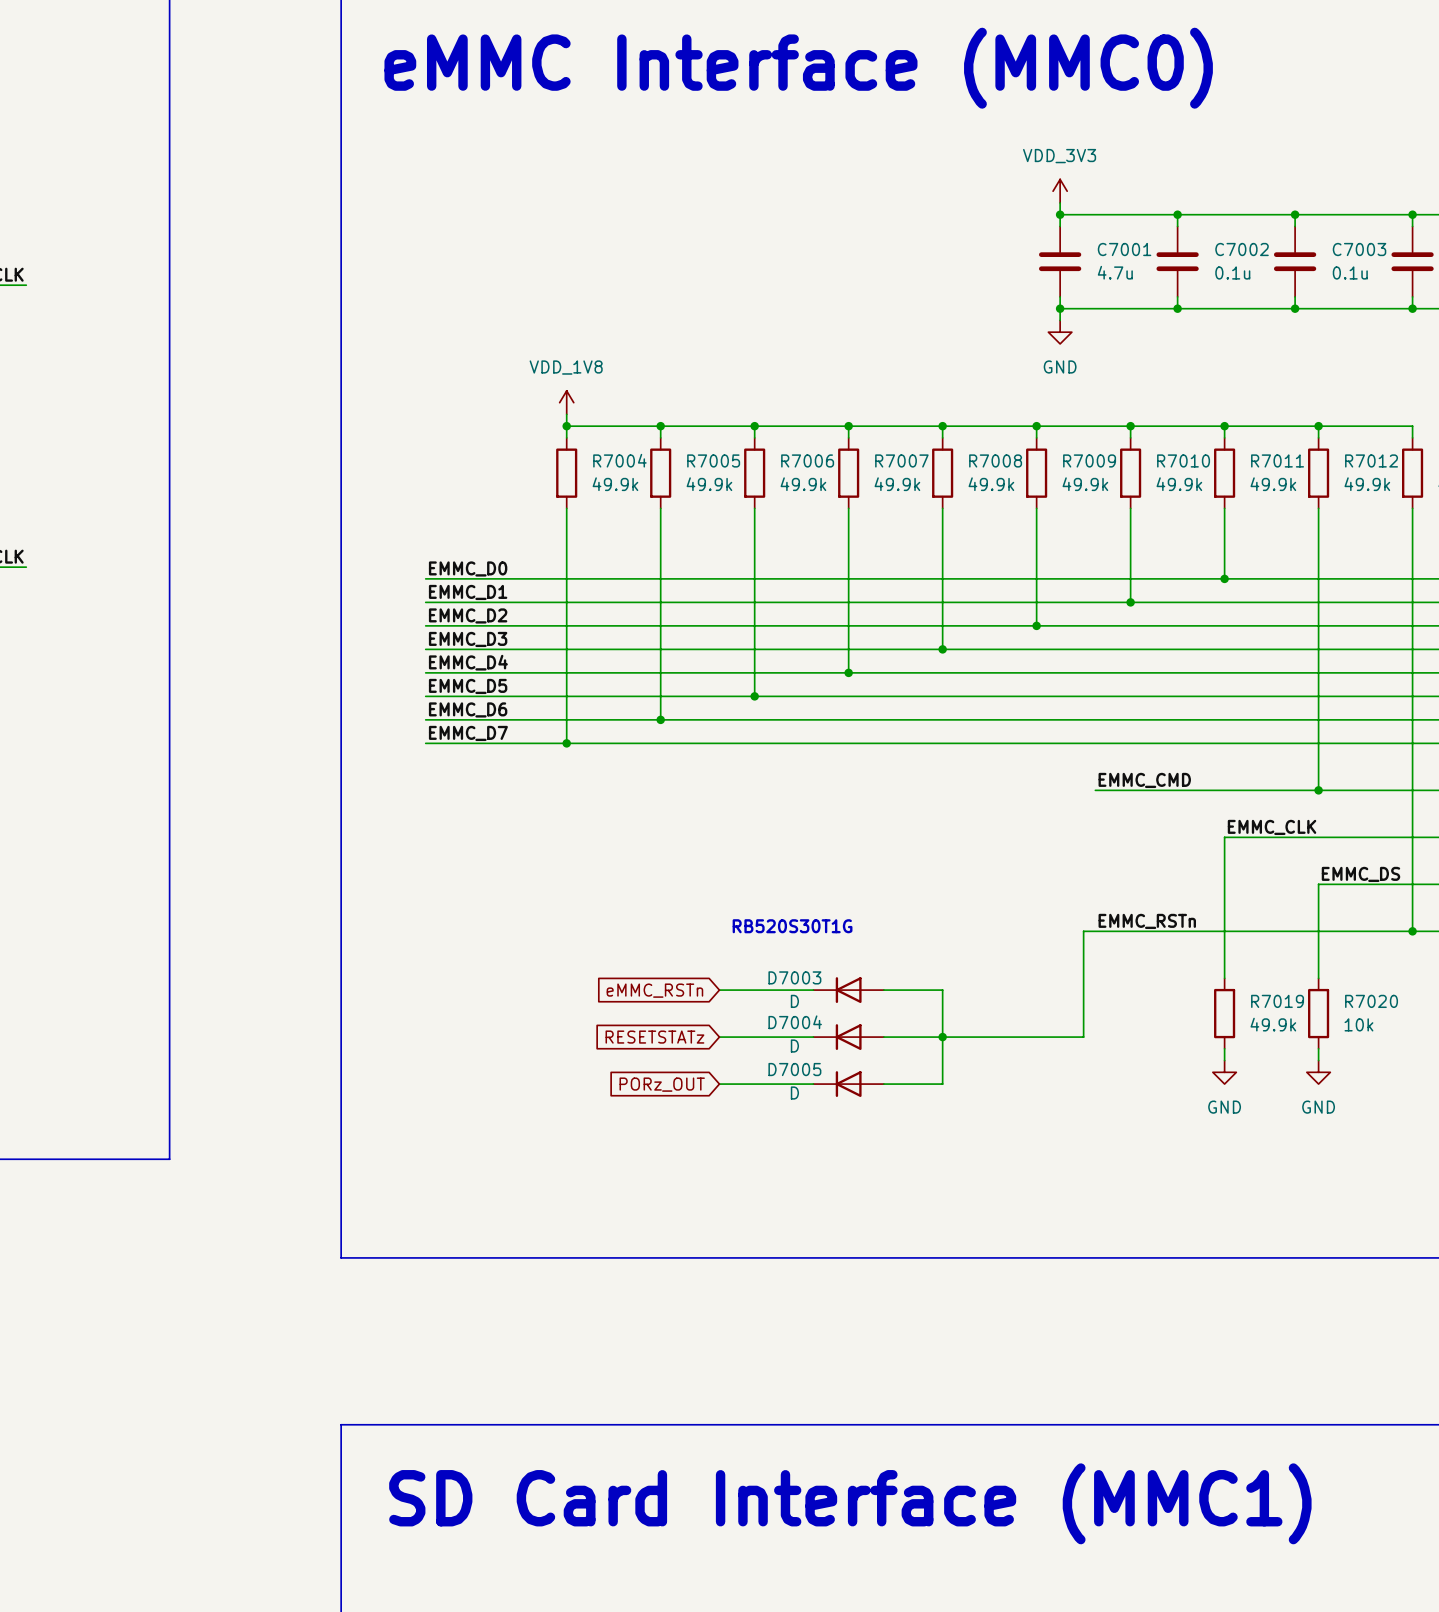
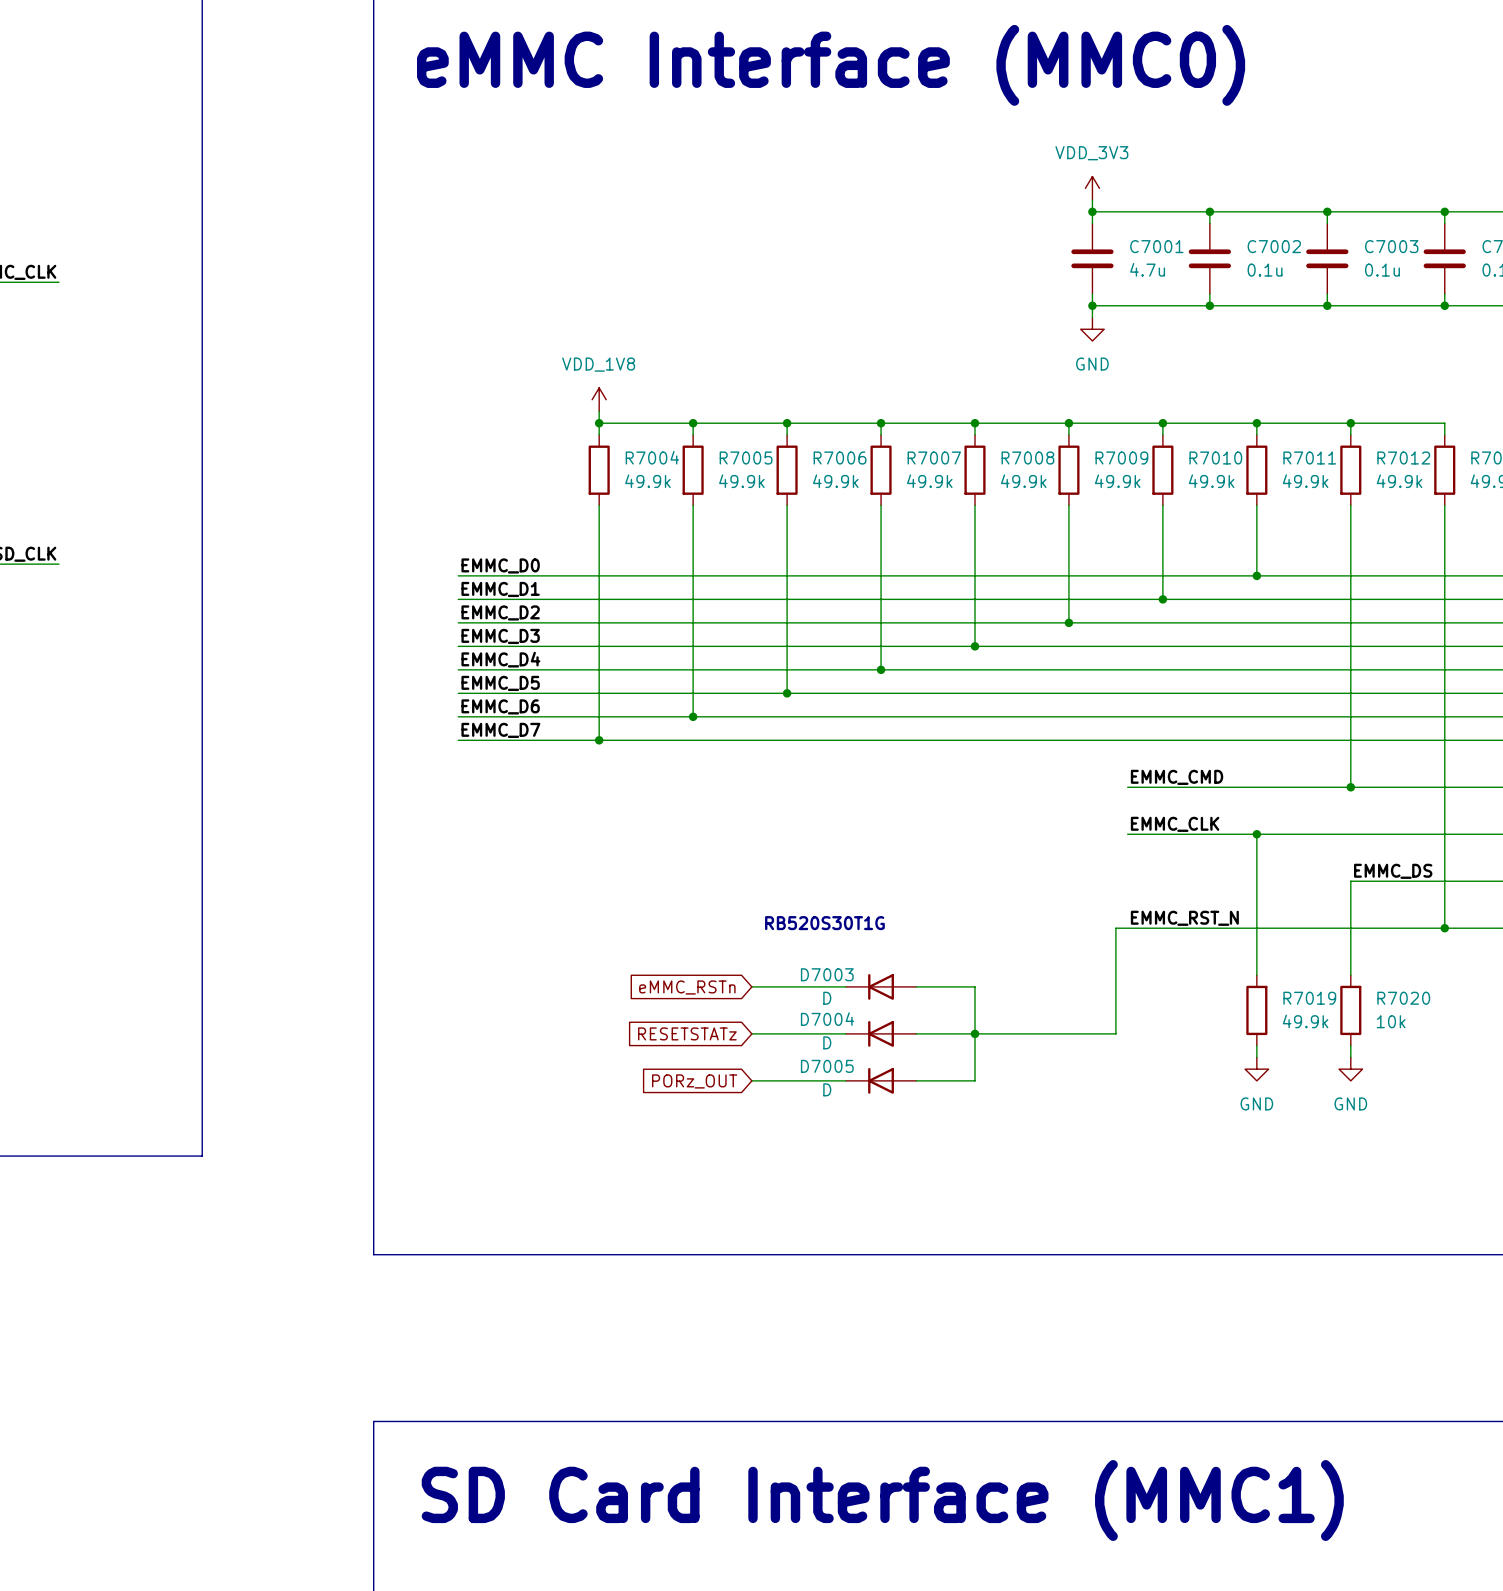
label position: EMMC_CLK (1272, 827) -> EMMC_CLK (1175, 824)
wire: none -> (1127, 834) (1256, 834)
junction: none -> (1256, 834)
label: EMMC_RSTn (1147, 921) -> EMMC_RST_N (1184, 918)

